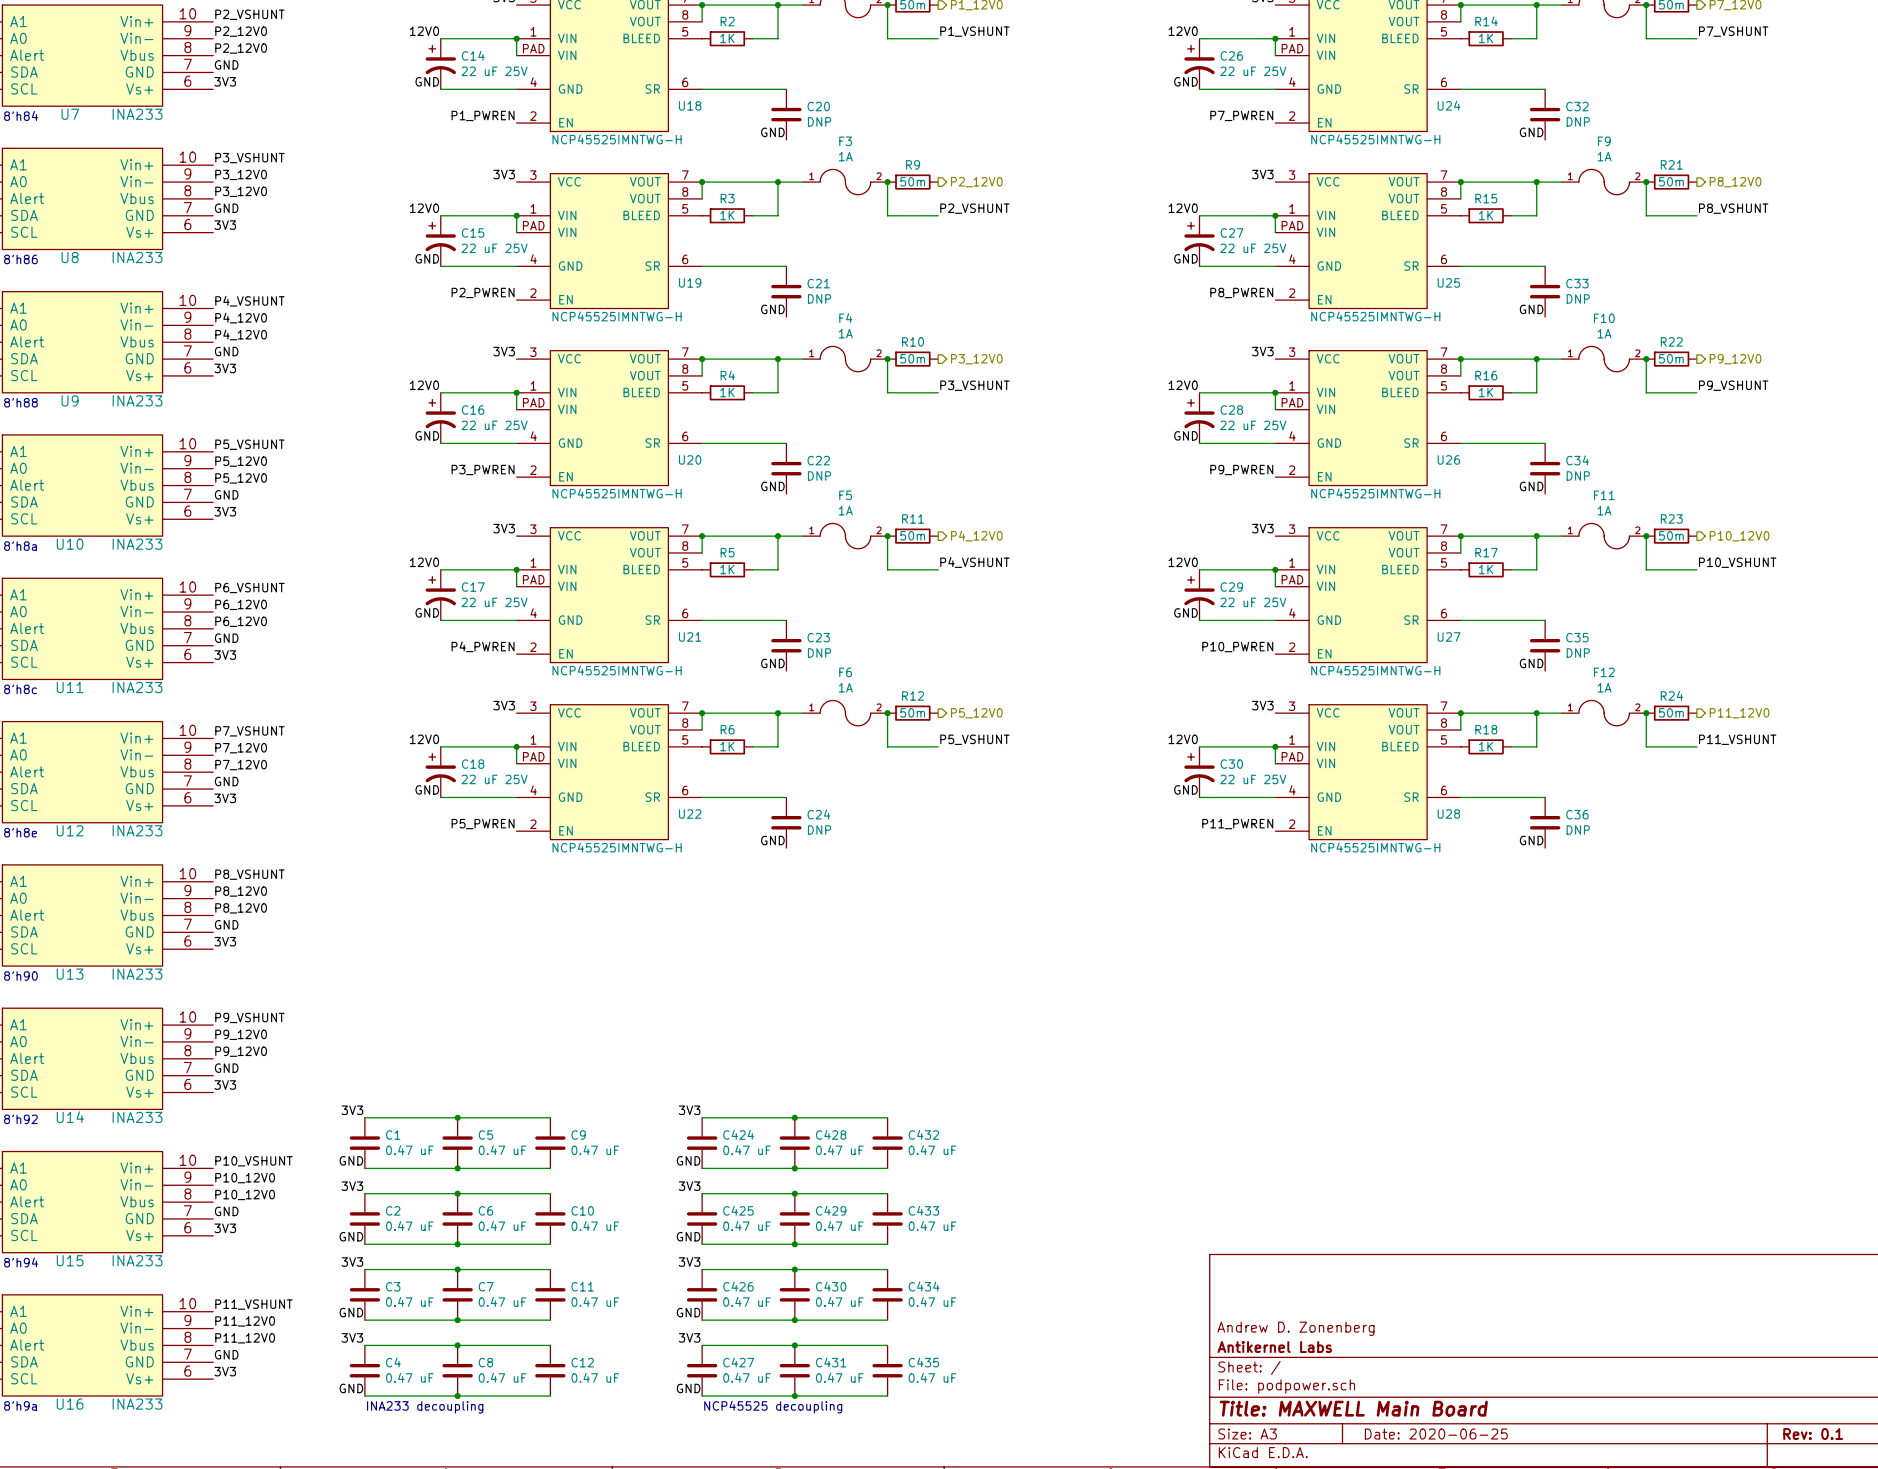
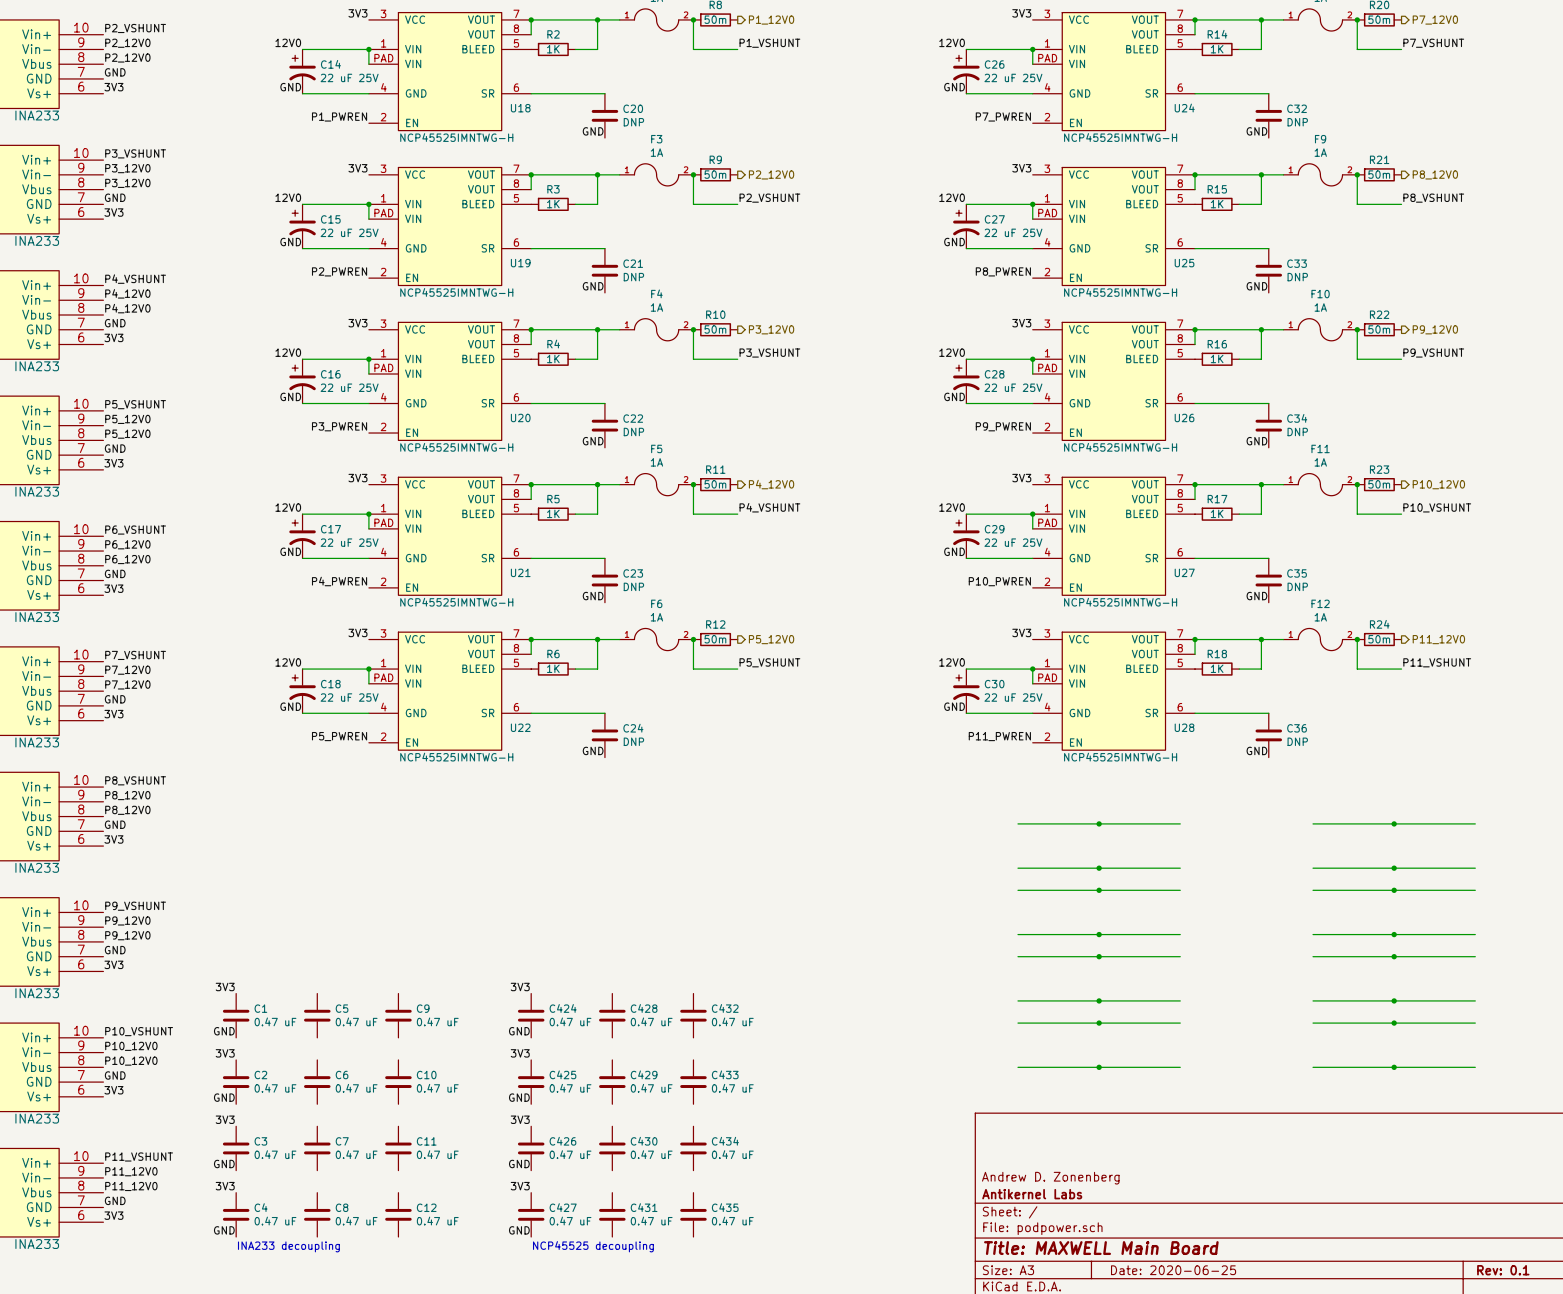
wire: none -> (1017, 823) (1180, 823)
junction: none -> (1099, 823)
wire: none -> (1313, 823) (1475, 823)
junction: none -> (1394, 823)
wire: none -> (1017, 868) (1180, 868)
junction: none -> (1099, 868)
wire: none -> (1313, 868) (1475, 868)
junction: none -> (1394, 868)
wire: none -> (1017, 890) (1180, 890)
junction: none -> (1099, 890)
wire: none -> (1313, 890) (1475, 890)
junction: none -> (1394, 890)
wire: none -> (1017, 934) (1180, 934)
junction: none -> (1099, 934)
wire: none -> (1313, 934) (1475, 934)
junction: none -> (1394, 934)
wire: none -> (1017, 956) (1180, 956)
junction: none -> (1099, 956)
wire: none -> (1313, 956) (1475, 956)
junction: none -> (1394, 956)
wire: (364, 1117) (550, 1117) -> none
junction: (457, 1117) -> none
wire: (702, 1117) (887, 1117) -> none
junction: (794, 1117) -> none
wire: none -> (1017, 1000) (1180, 1000)
junction: none -> (1099, 1000)
wire: none -> (1313, 1000) (1475, 1000)
junction: none -> (1394, 1000)
wire: none -> (1017, 1023) (1180, 1023)
junction: none -> (1099, 1023)
wire: none -> (1313, 1023) (1475, 1023)
junction: none -> (1394, 1023)
wire: (364, 1168) (550, 1168) -> none
junction: (457, 1168) -> none
wire: (702, 1168) (887, 1168) -> none
junction: (794, 1168) -> none
wire: (364, 1193) (550, 1193) -> none
junction: (457, 1193) -> none
wire: (702, 1193) (887, 1193) -> none
junction: (794, 1193) -> none
wire: none -> (1017, 1067) (1180, 1067)
junction: none -> (1099, 1067)
wire: none -> (1313, 1067) (1475, 1067)
junction: none -> (1394, 1067)
wire: (364, 1244) (550, 1244) -> none
junction: (457, 1244) -> none
wire: (702, 1244) (887, 1244) -> none
junction: (794, 1244) -> none
wire: (364, 1269) (550, 1269) -> none
junction: (457, 1269) -> none
wire: (702, 1269) (887, 1269) -> none
junction: (794, 1269) -> none
wire: (364, 1320) (550, 1320) -> none
junction: (457, 1320) -> none
wire: (702, 1320) (887, 1320) -> none
junction: (794, 1320) -> none
wire: (364, 1345) (550, 1345) -> none
junction: (457, 1345) -> none
wire: (702, 1345) (887, 1345) -> none
junction: (794, 1345) -> none
wire: (364, 1396) (550, 1396) -> none
junction: (457, 1396) -> none
wire: (702, 1396) (887, 1396) -> none
junction: (794, 1396) -> none

